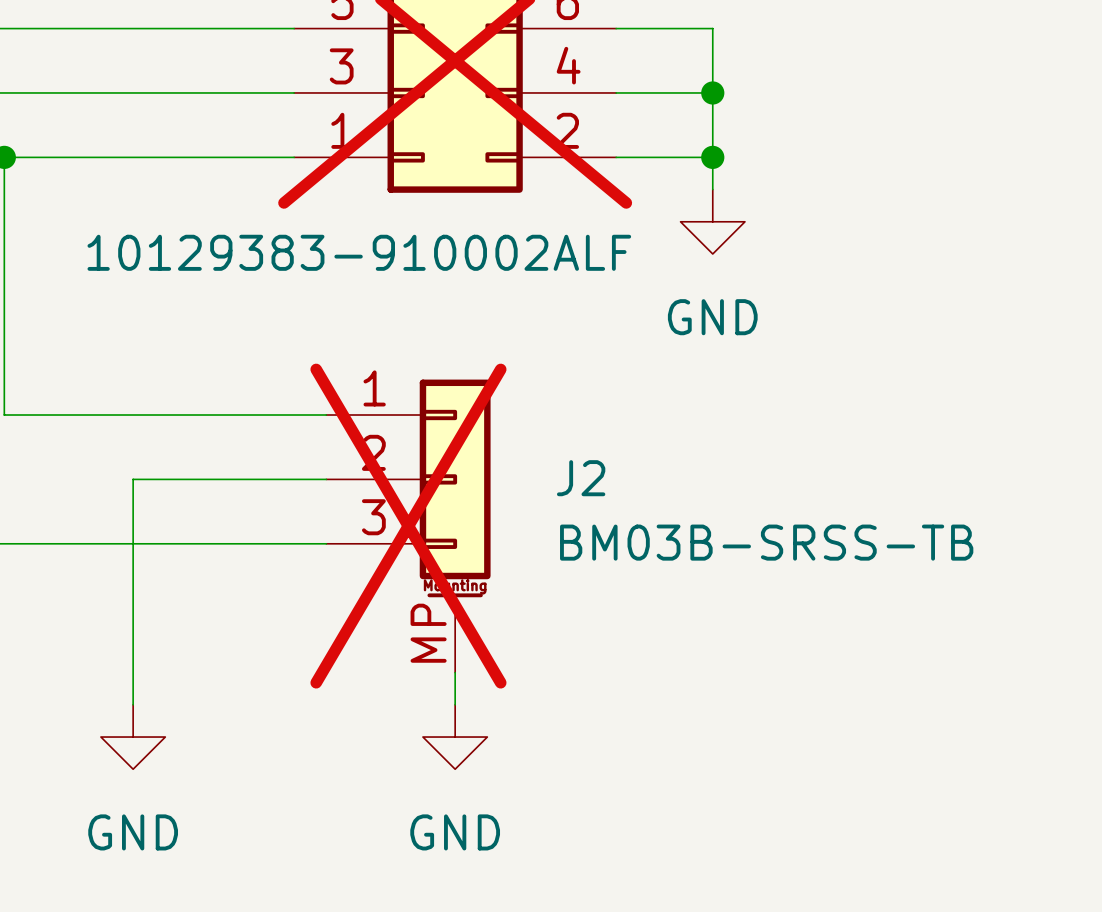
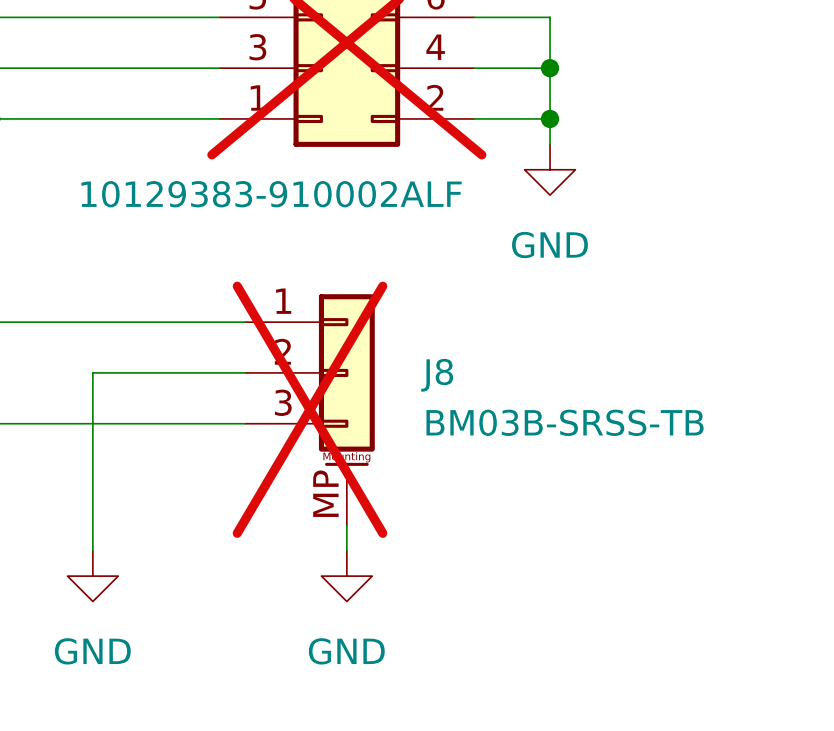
J2 name: J2 (581, 478) -> J8 (437, 375)

